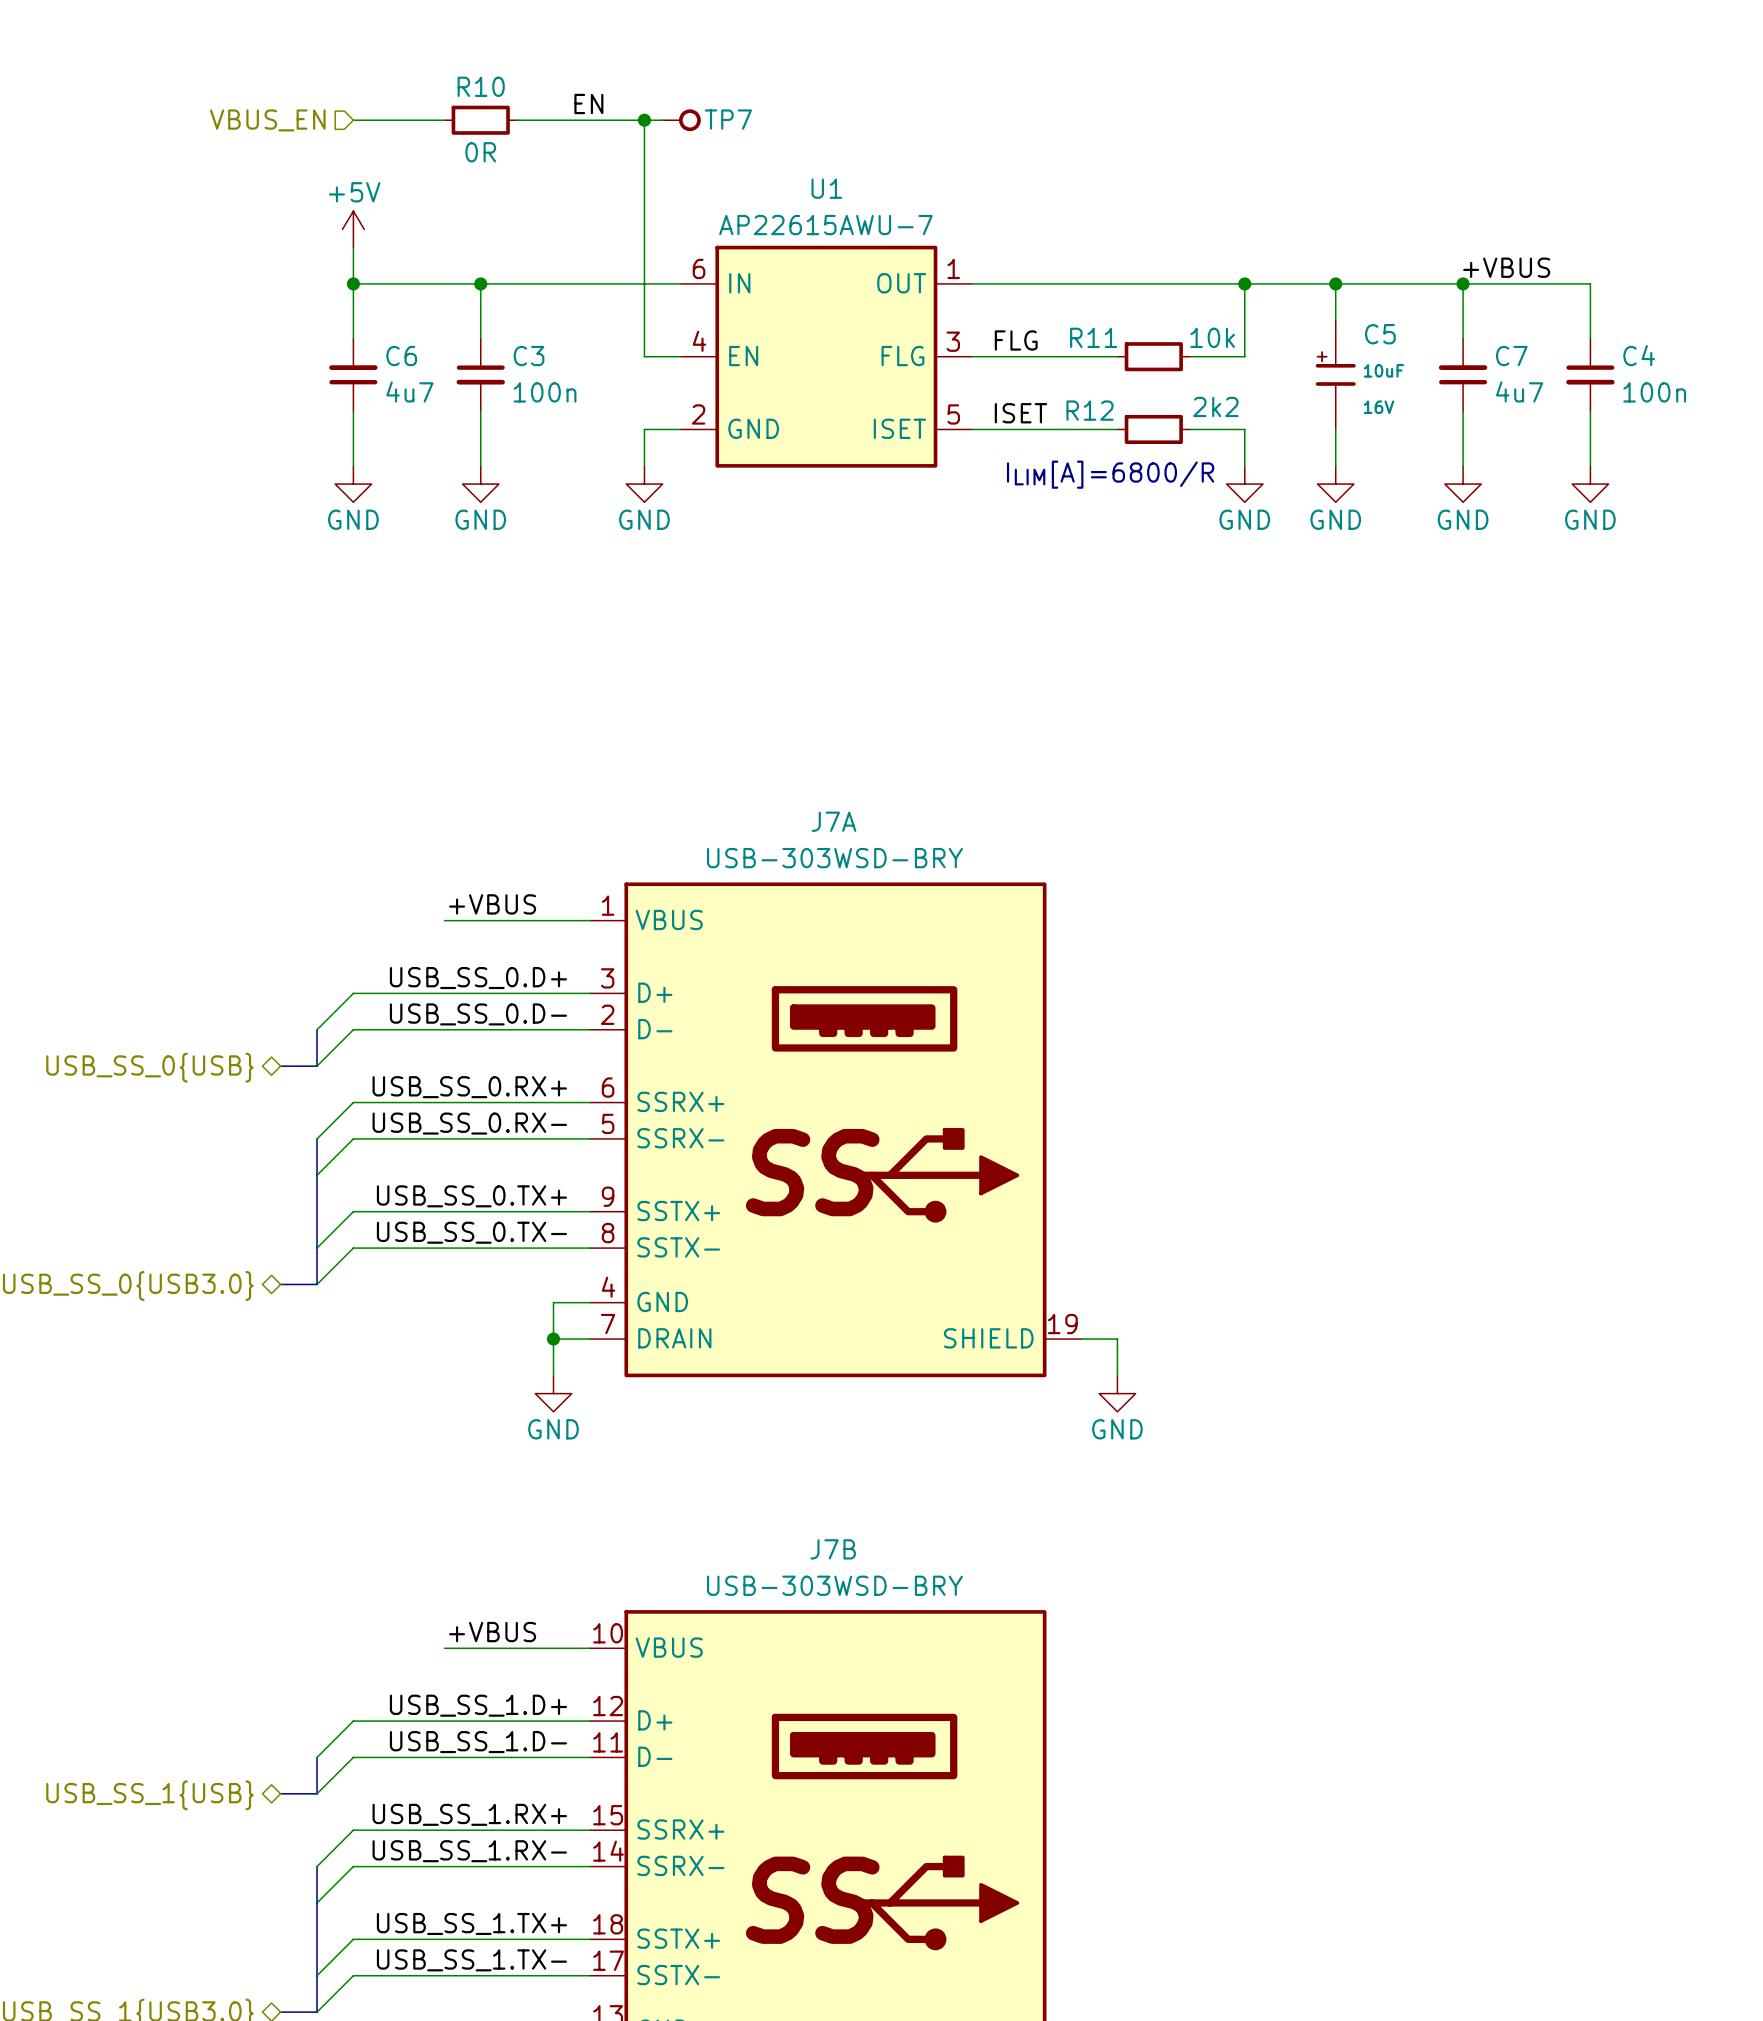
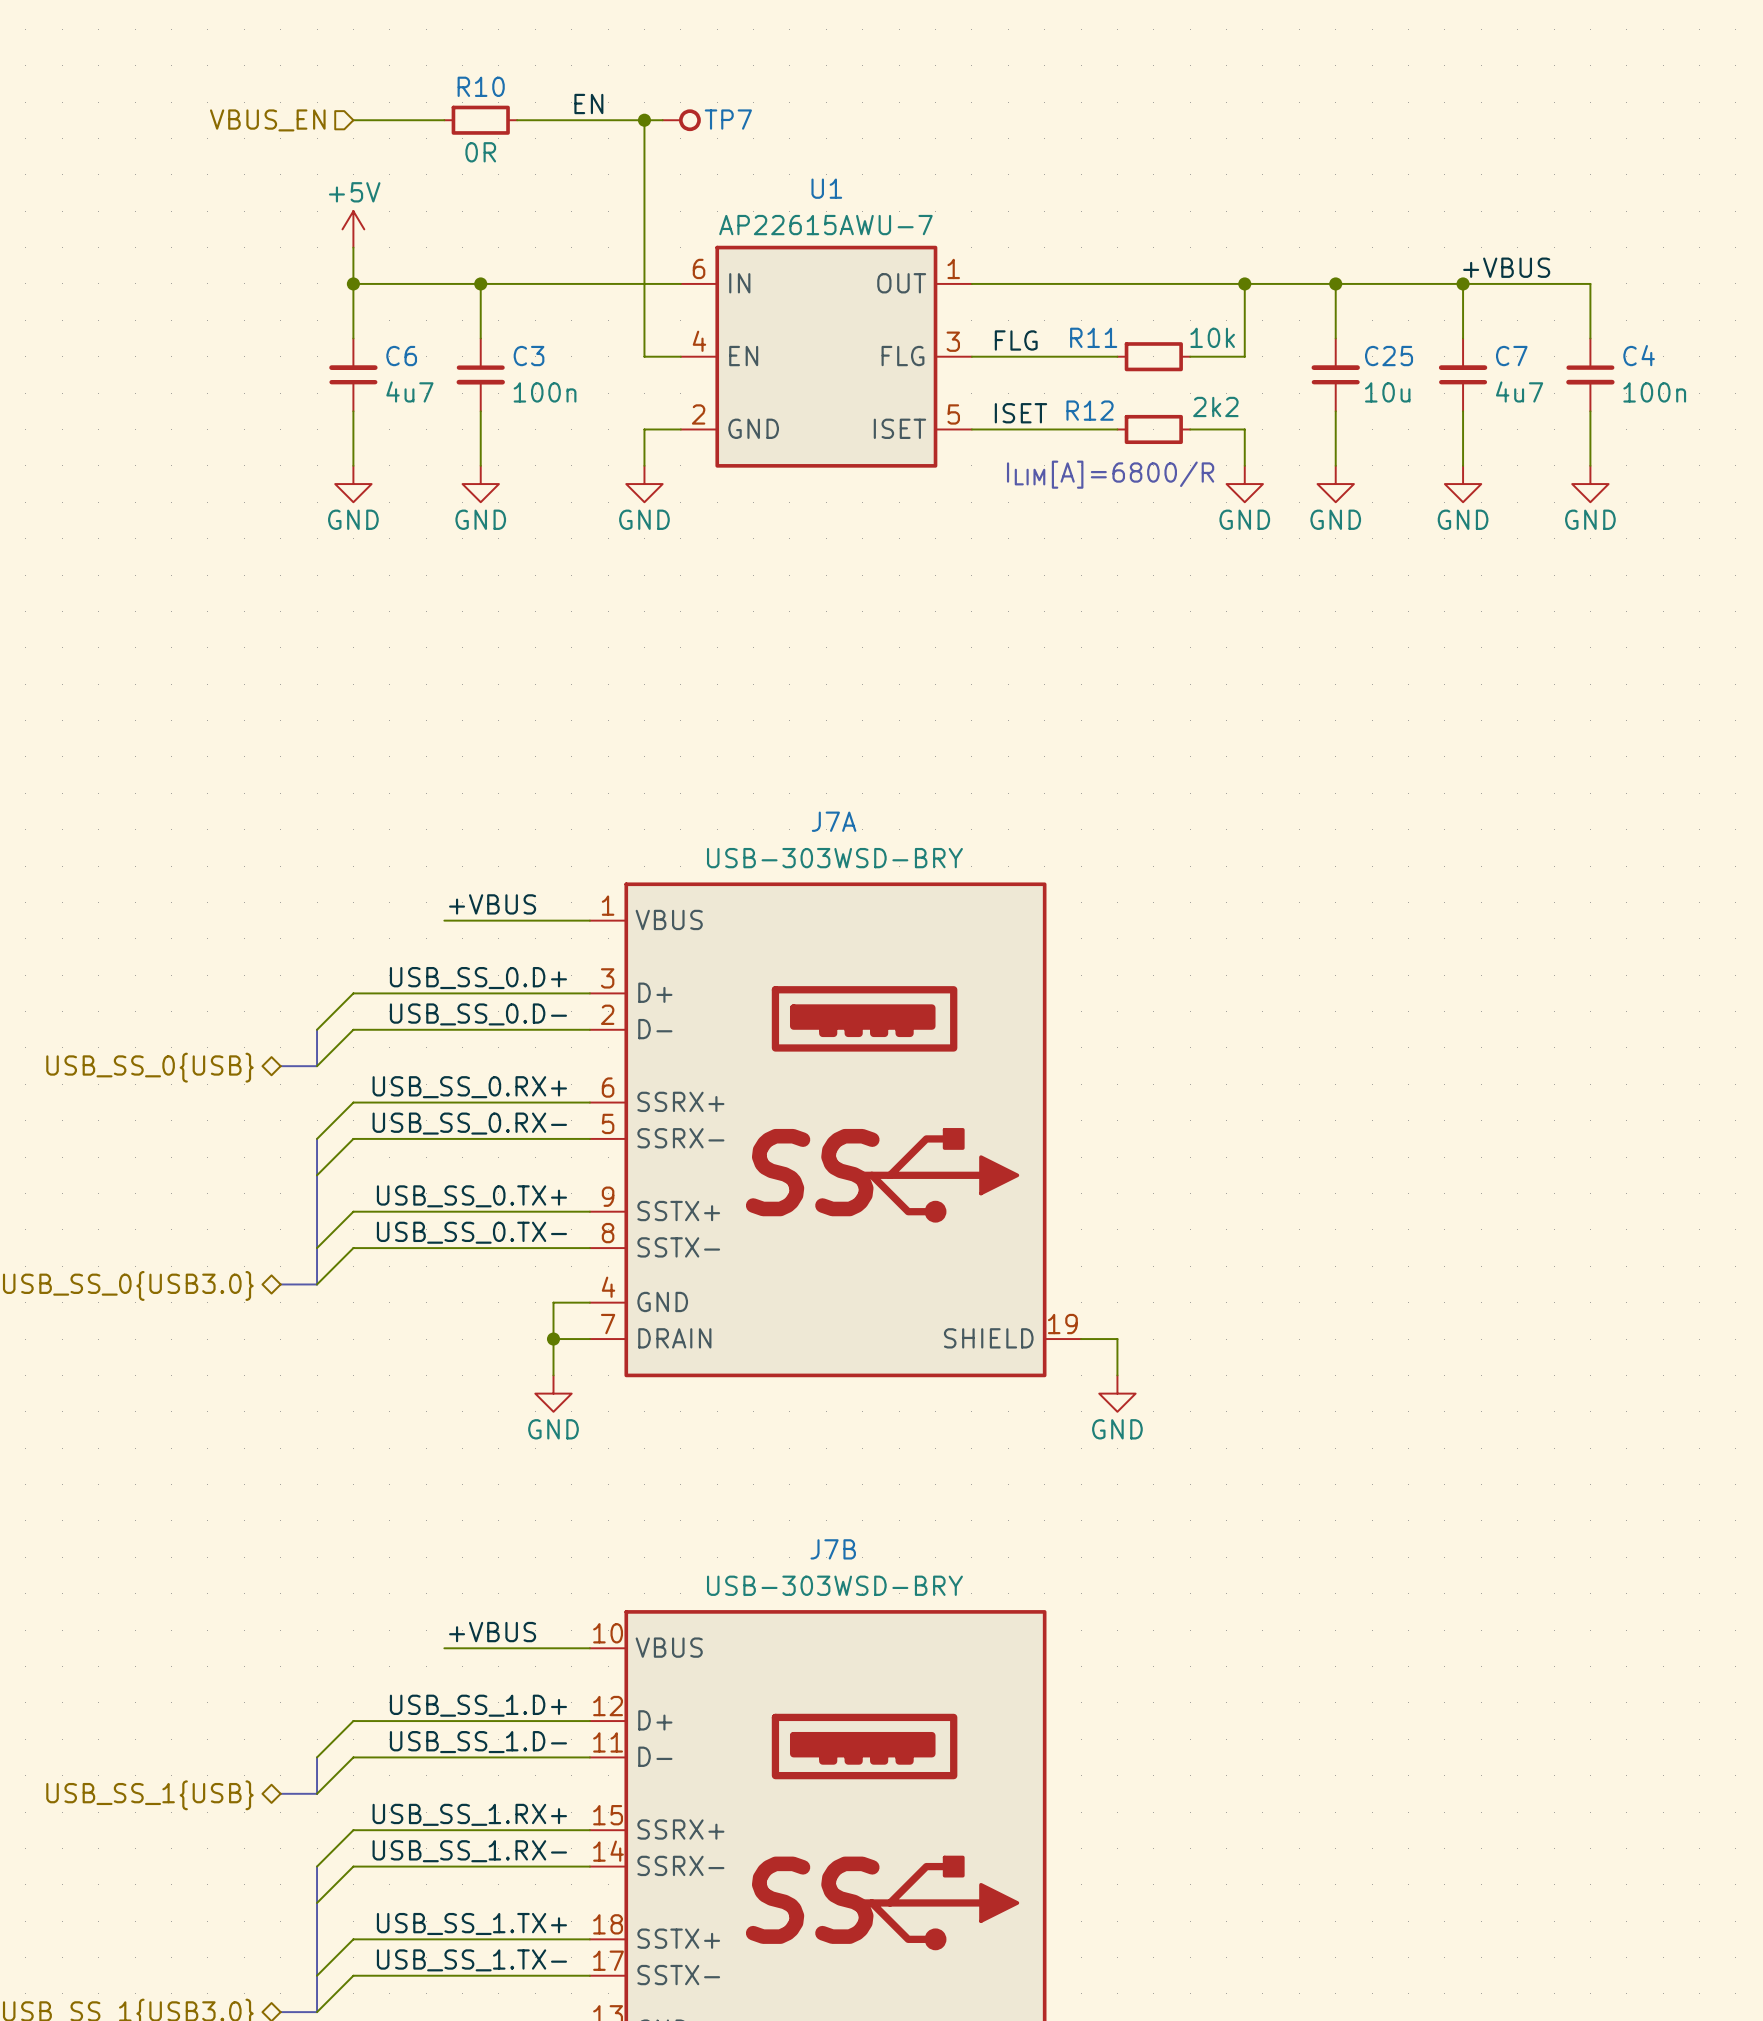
C5: 10uF (1335, 374) -> none
C25: none -> (1335, 374)

